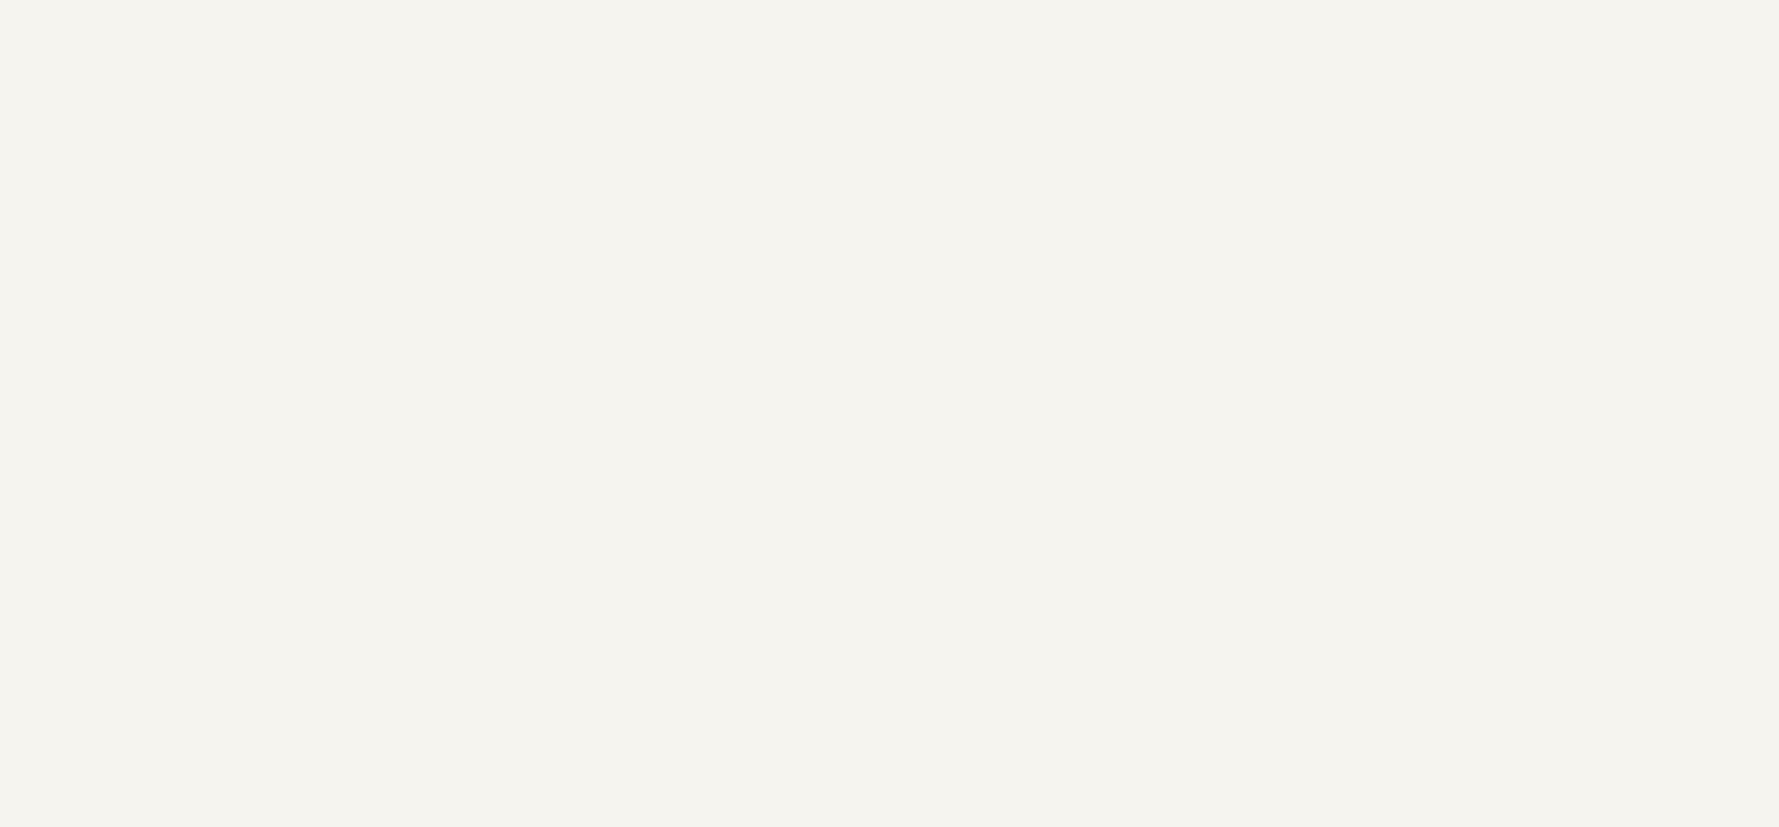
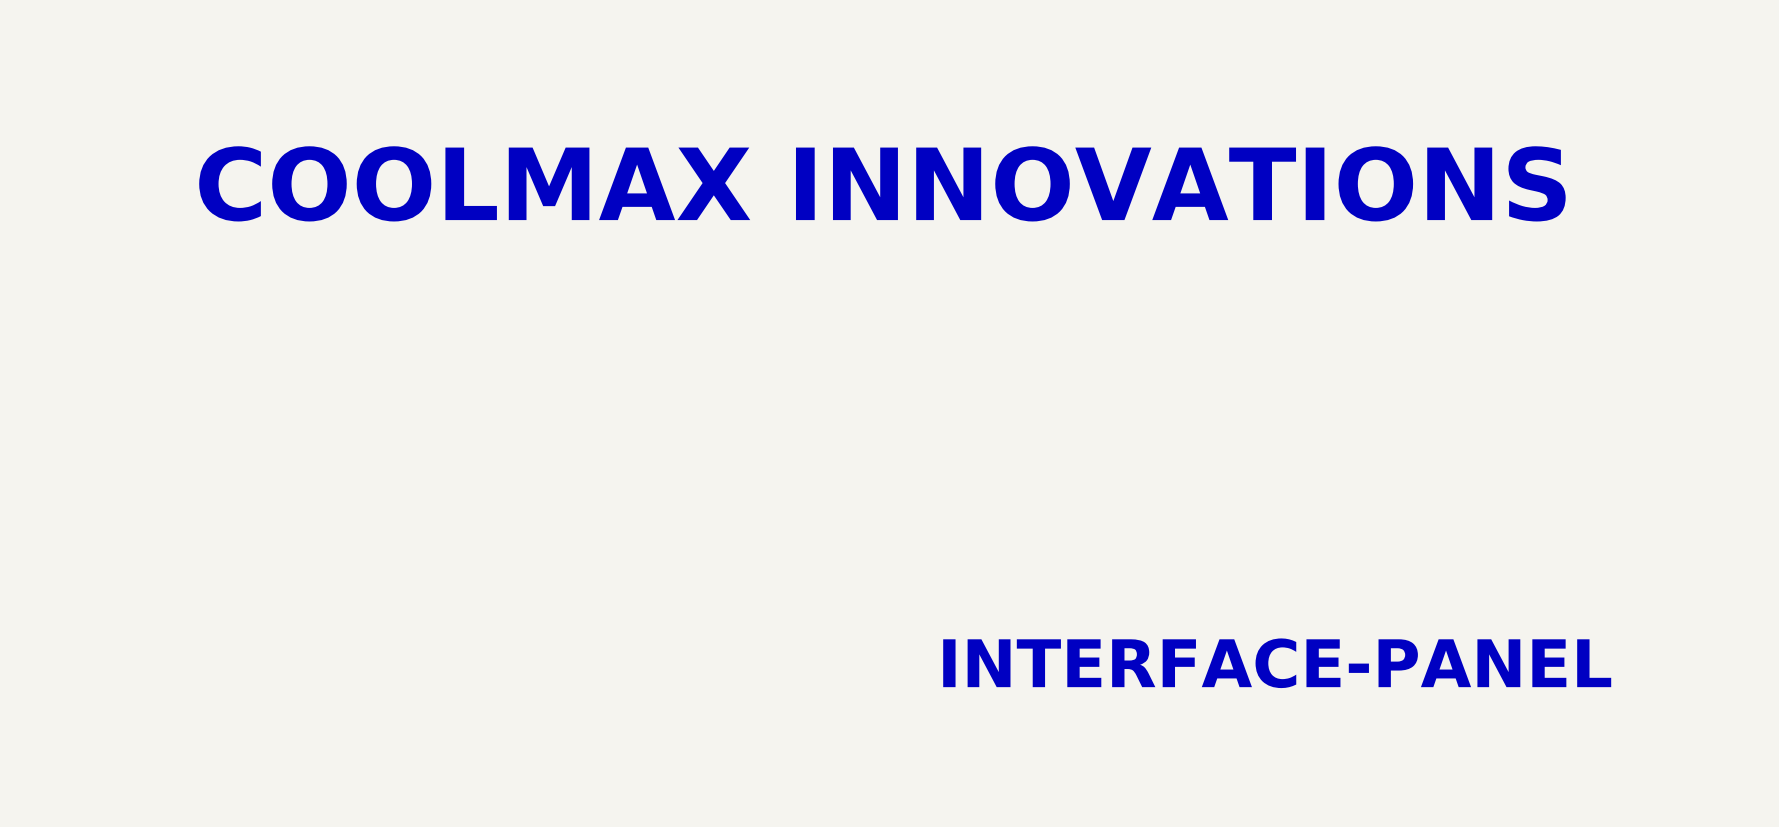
text: none -> COOLMAX INNOVATIONS (882, 183)
text: none -> INTERFACE-PANEL (1277, 663)

